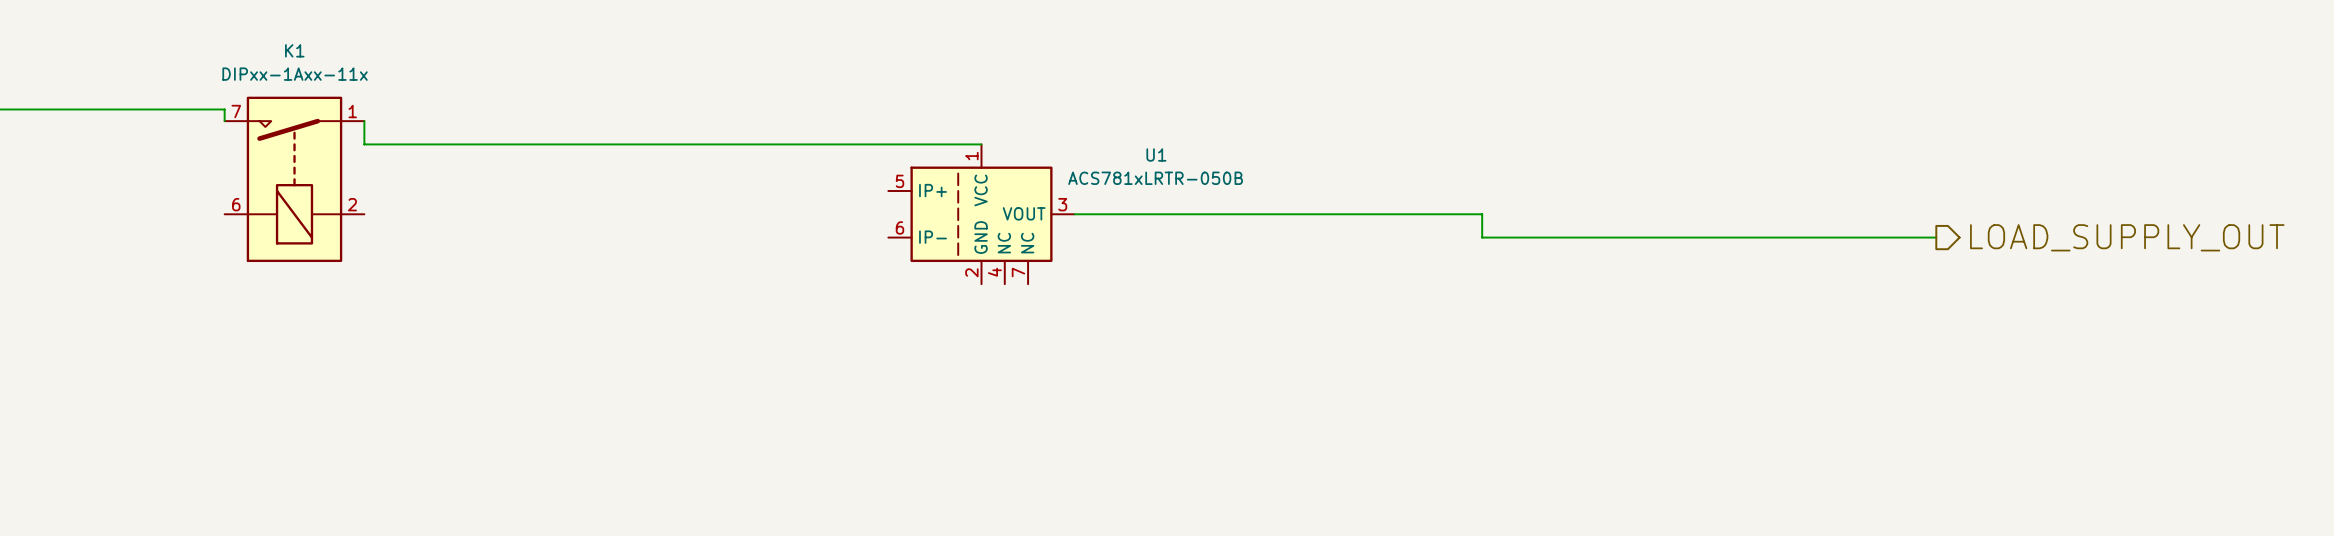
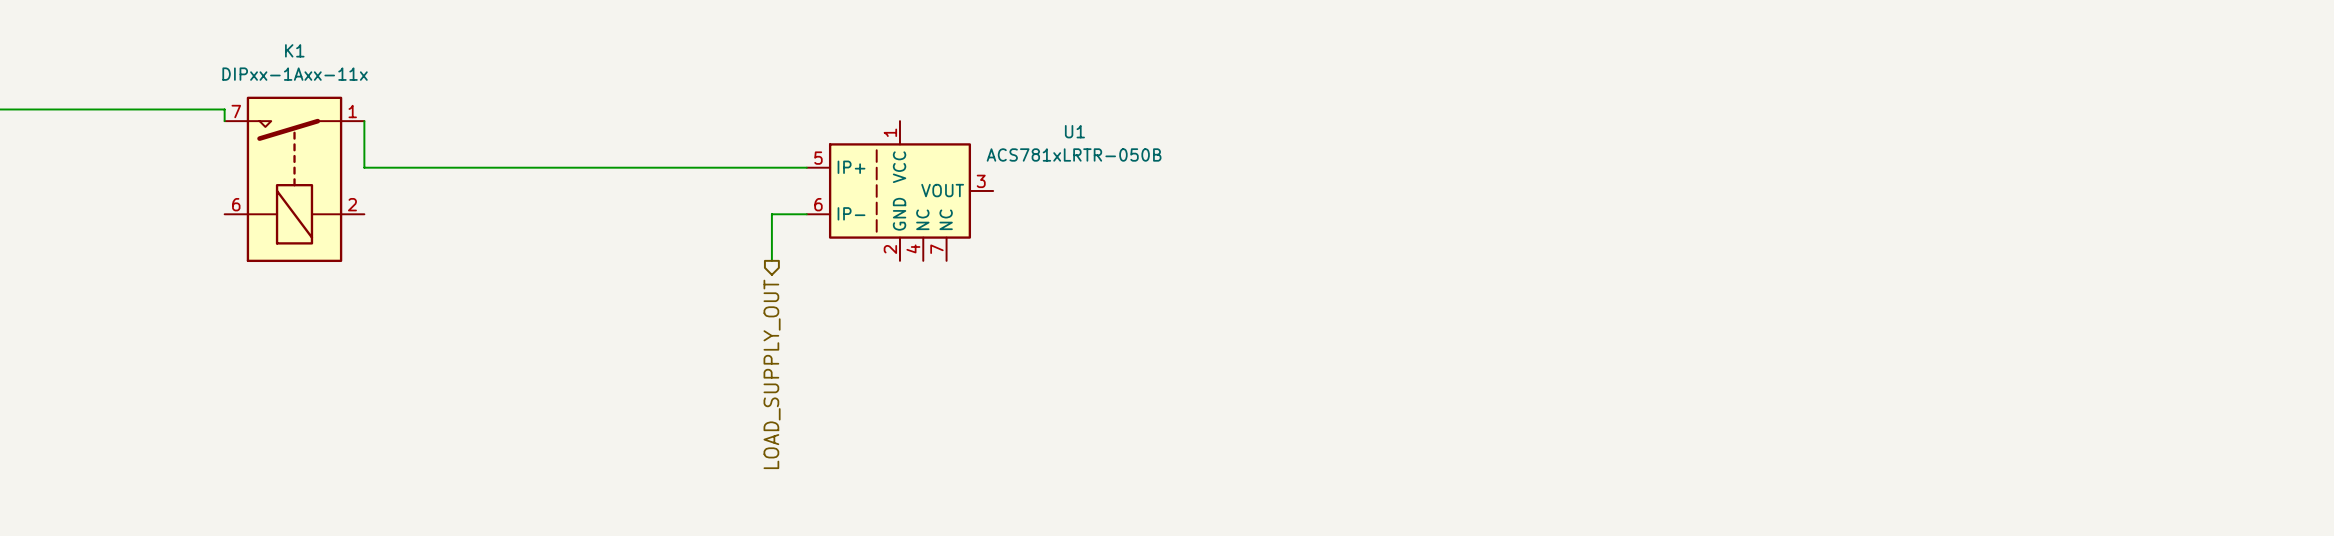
wire: (364, 144) (981, 144) -> (364, 144) (364, 167) (806, 167)
wire: none -> (806, 214) (771, 214) (771, 260)
U1 position: (981, 214) -> (899, 190)
wire: (1074, 214) (1482, 214) (1482, 237) (1936, 237) -> none
hierarchical label: LOAD_SUPPLY_OUT (2127, 237) -> none
hierarchical label: none -> LOAD_SUPPLY_OUT (772, 374)

